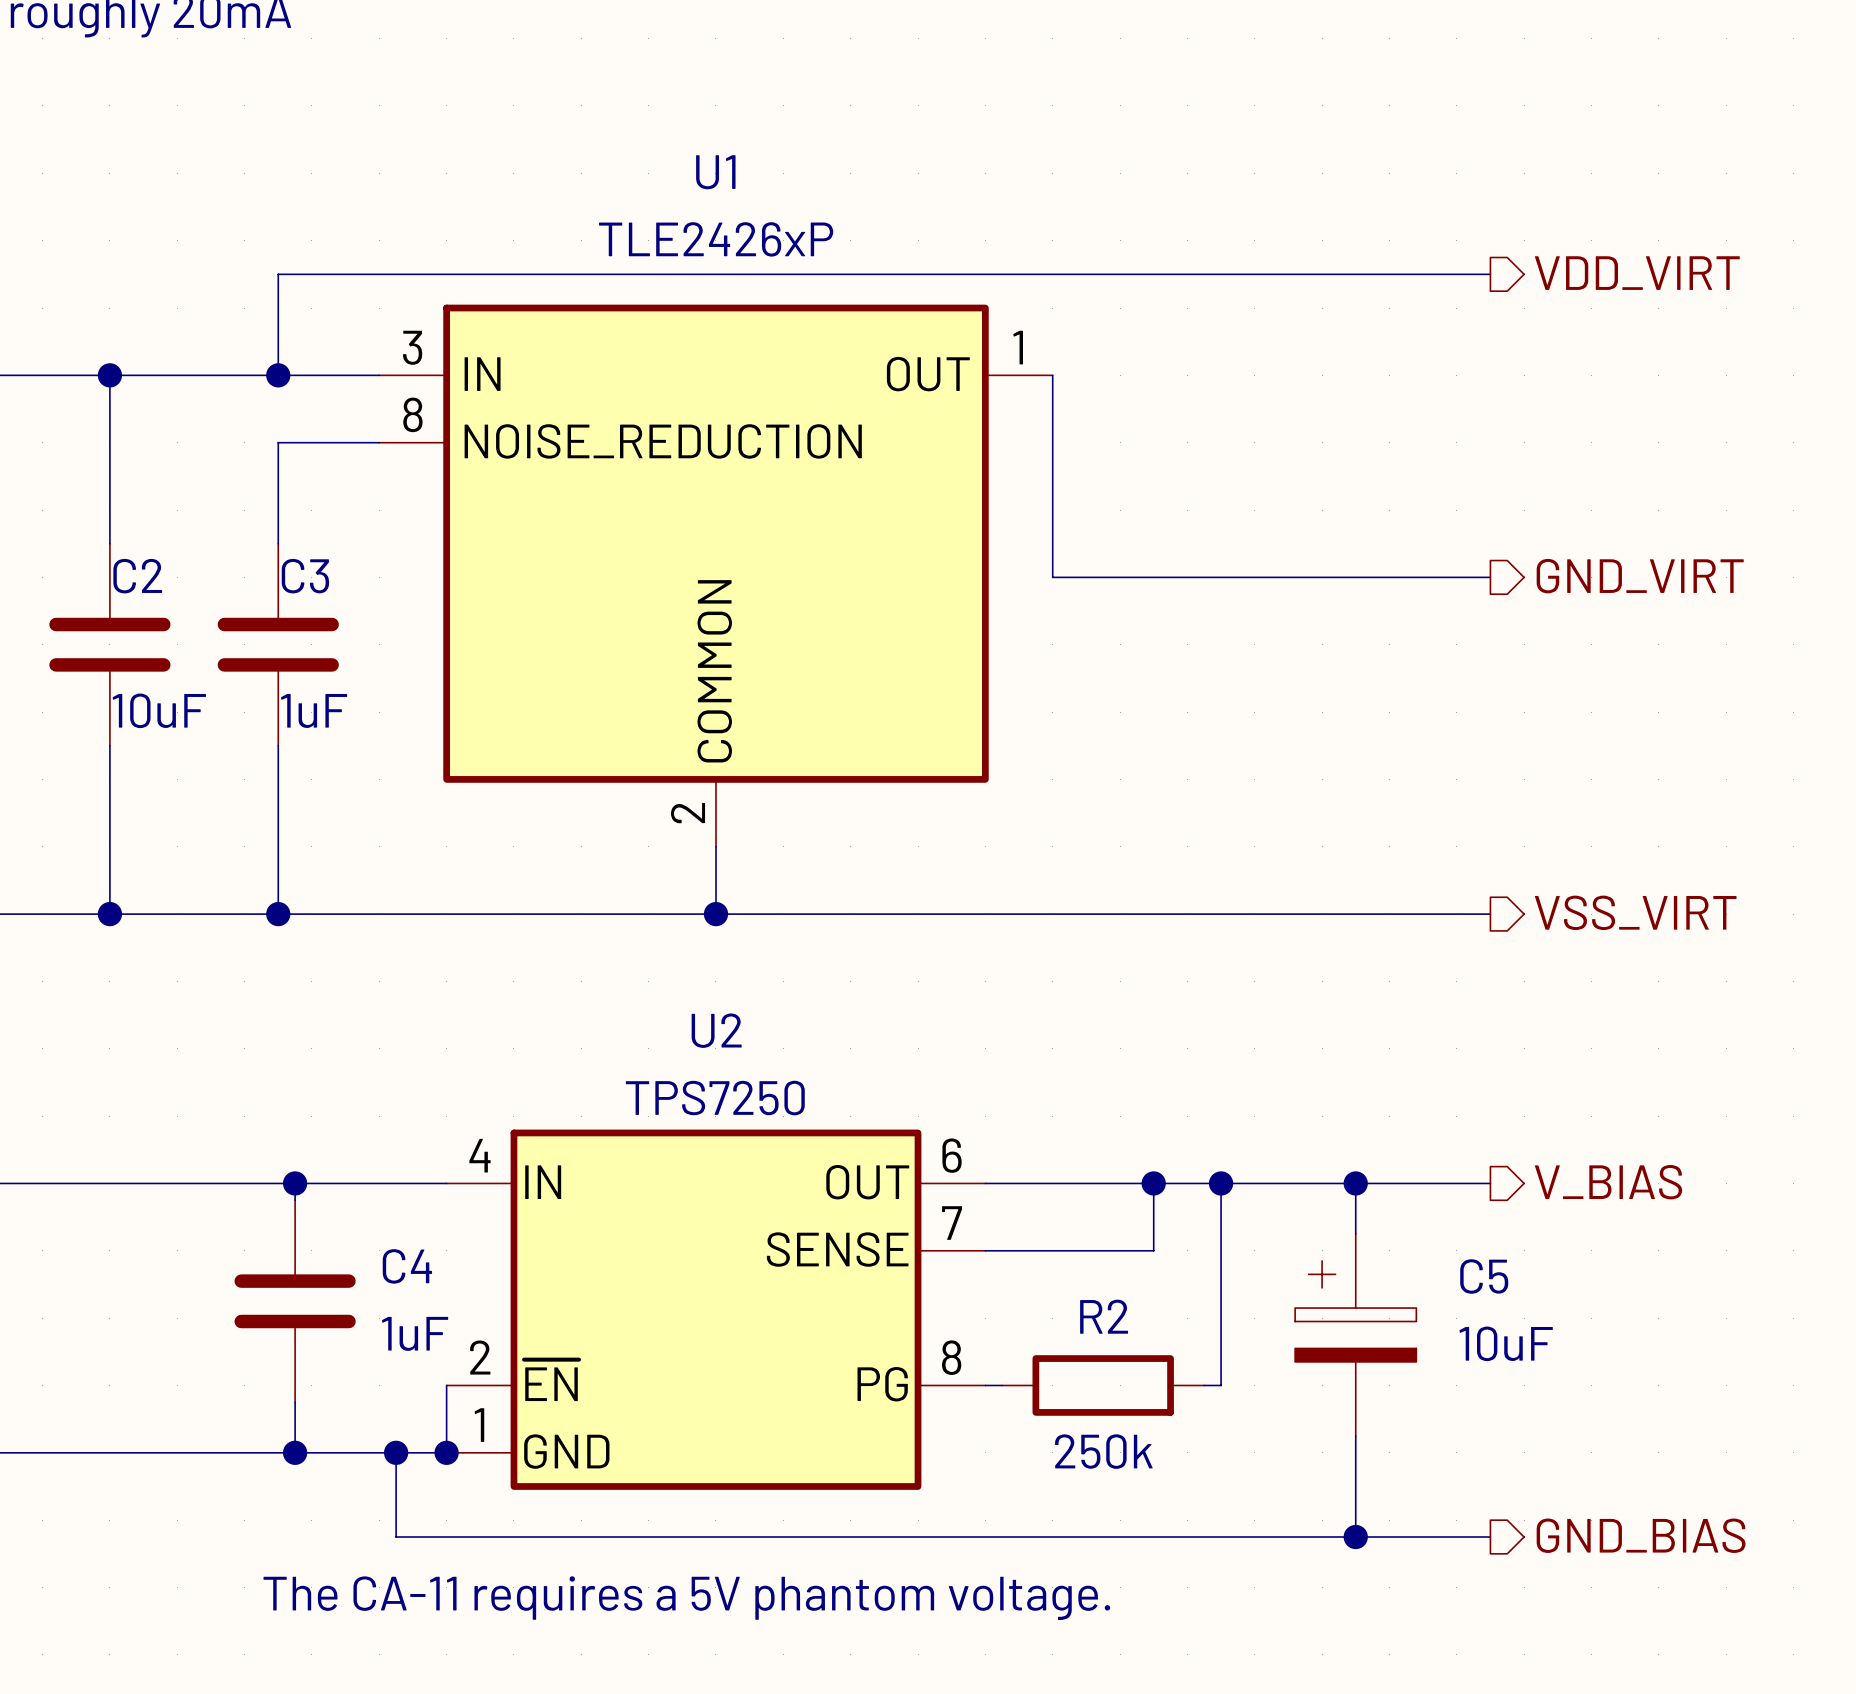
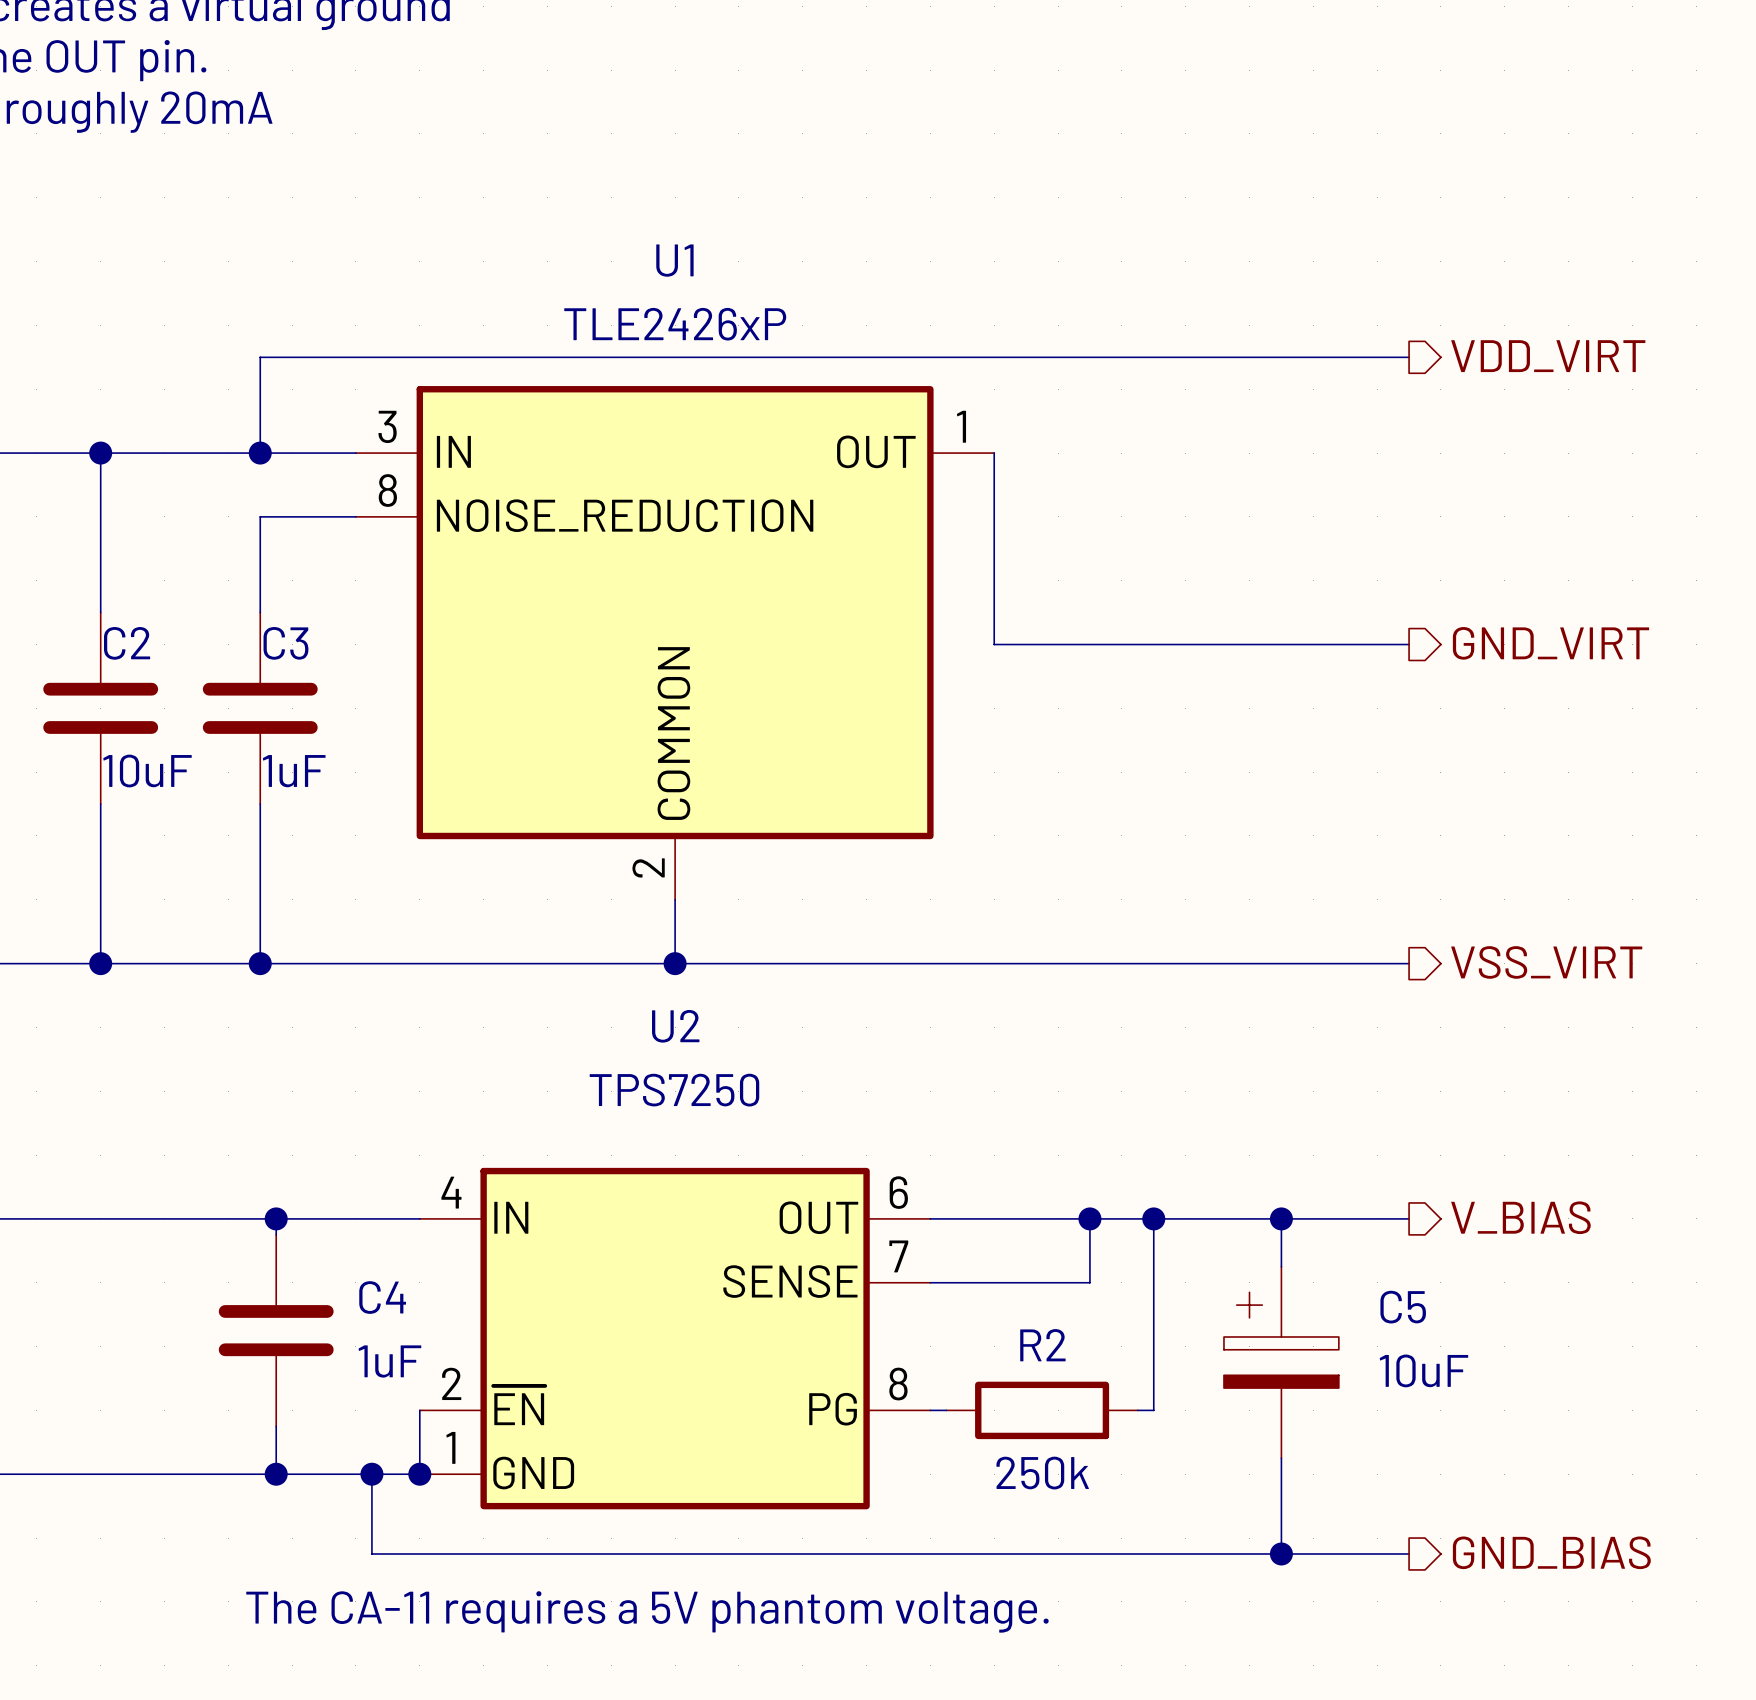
U2 name position: U2 (716, 1030) -> U2 (675, 1026)
U2 value position: TPS7250 (715, 1098) -> TPS7250 (674, 1090)

